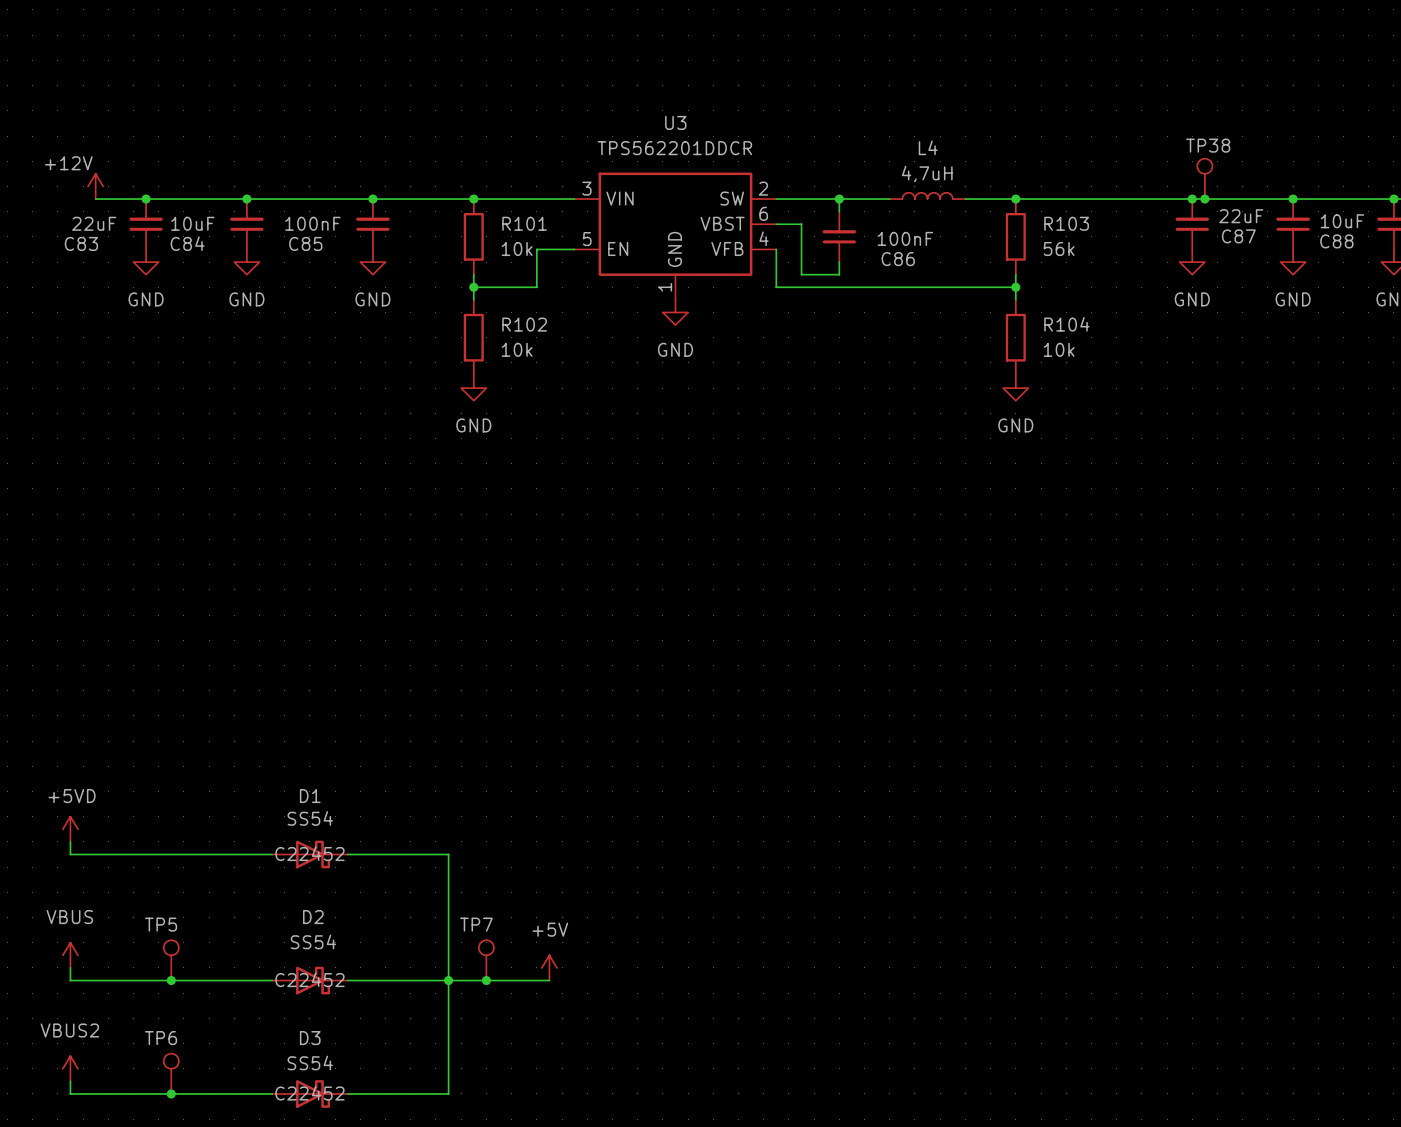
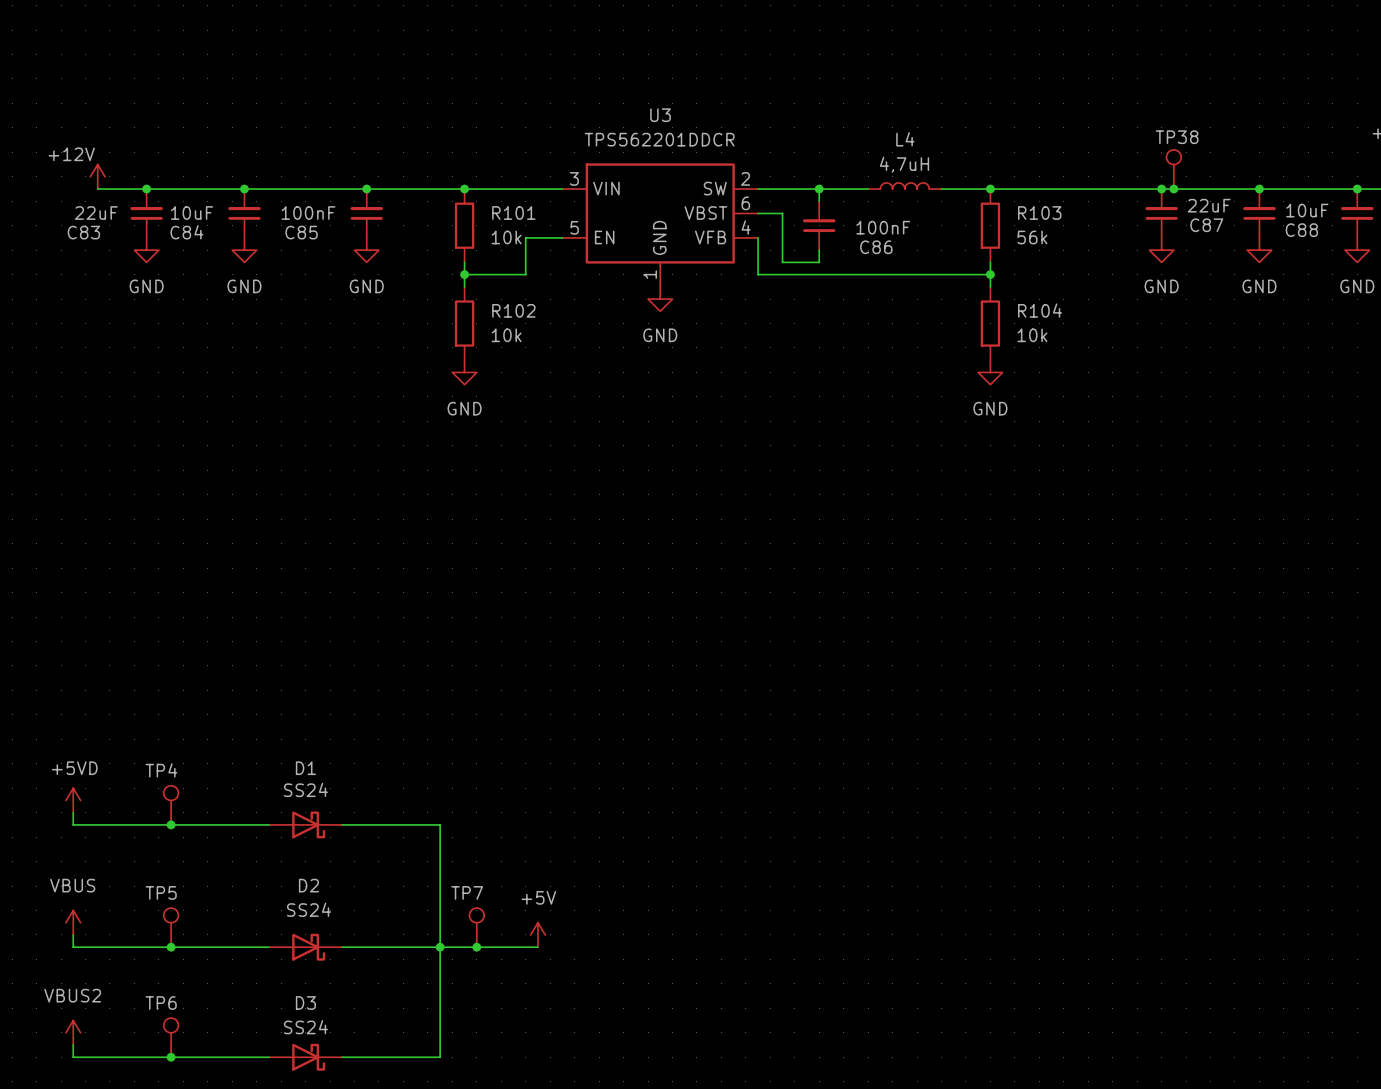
D1 value: SS54 (310, 818) -> SS24 (305, 789)
TP4: none -> (171, 805)
D1 text: C22452 (309, 853) -> none
junction: none -> (171, 824)
D2 value: SS54 (313, 941) -> SS24 (308, 909)
D2 text: C22452 (309, 979) -> none
D3 value: SS54 (310, 1062) -> SS24 (305, 1027)
D3 text: C22452 (309, 1093) -> none

